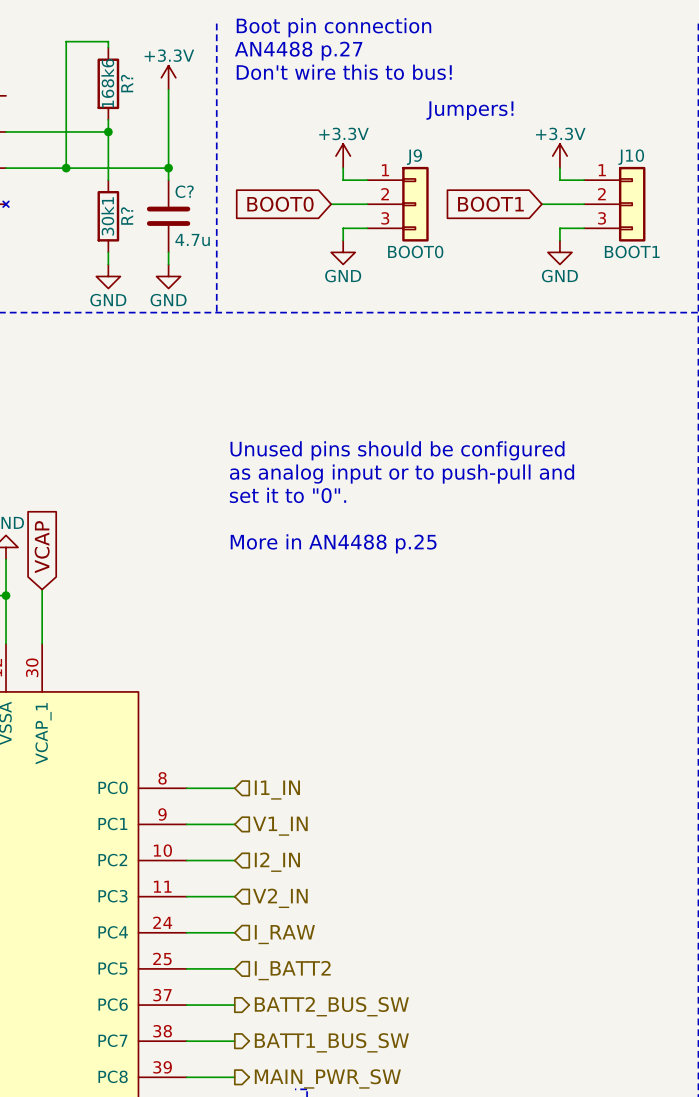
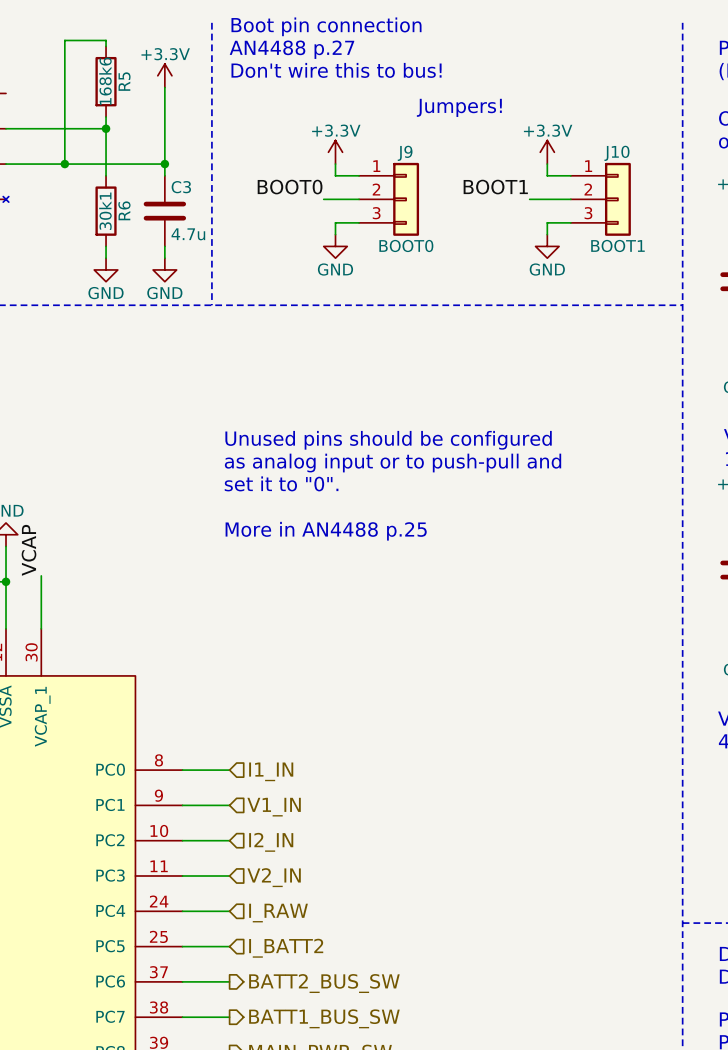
R? name: R? (127, 83) -> R5 (124, 81)
C? name: C? (184, 191) -> C3 (181, 187)
label: none -> BOOT0 (290, 187)
label: none -> BOOT1 (495, 187)
global label: BOOT0 (280, 204) -> none
global label: BOOT1 (490, 204) -> none
R? name: R? (127, 216) -> R6 (124, 210)
global label: VCAP (42, 547) -> none
label: none -> VCAP (29, 550)

